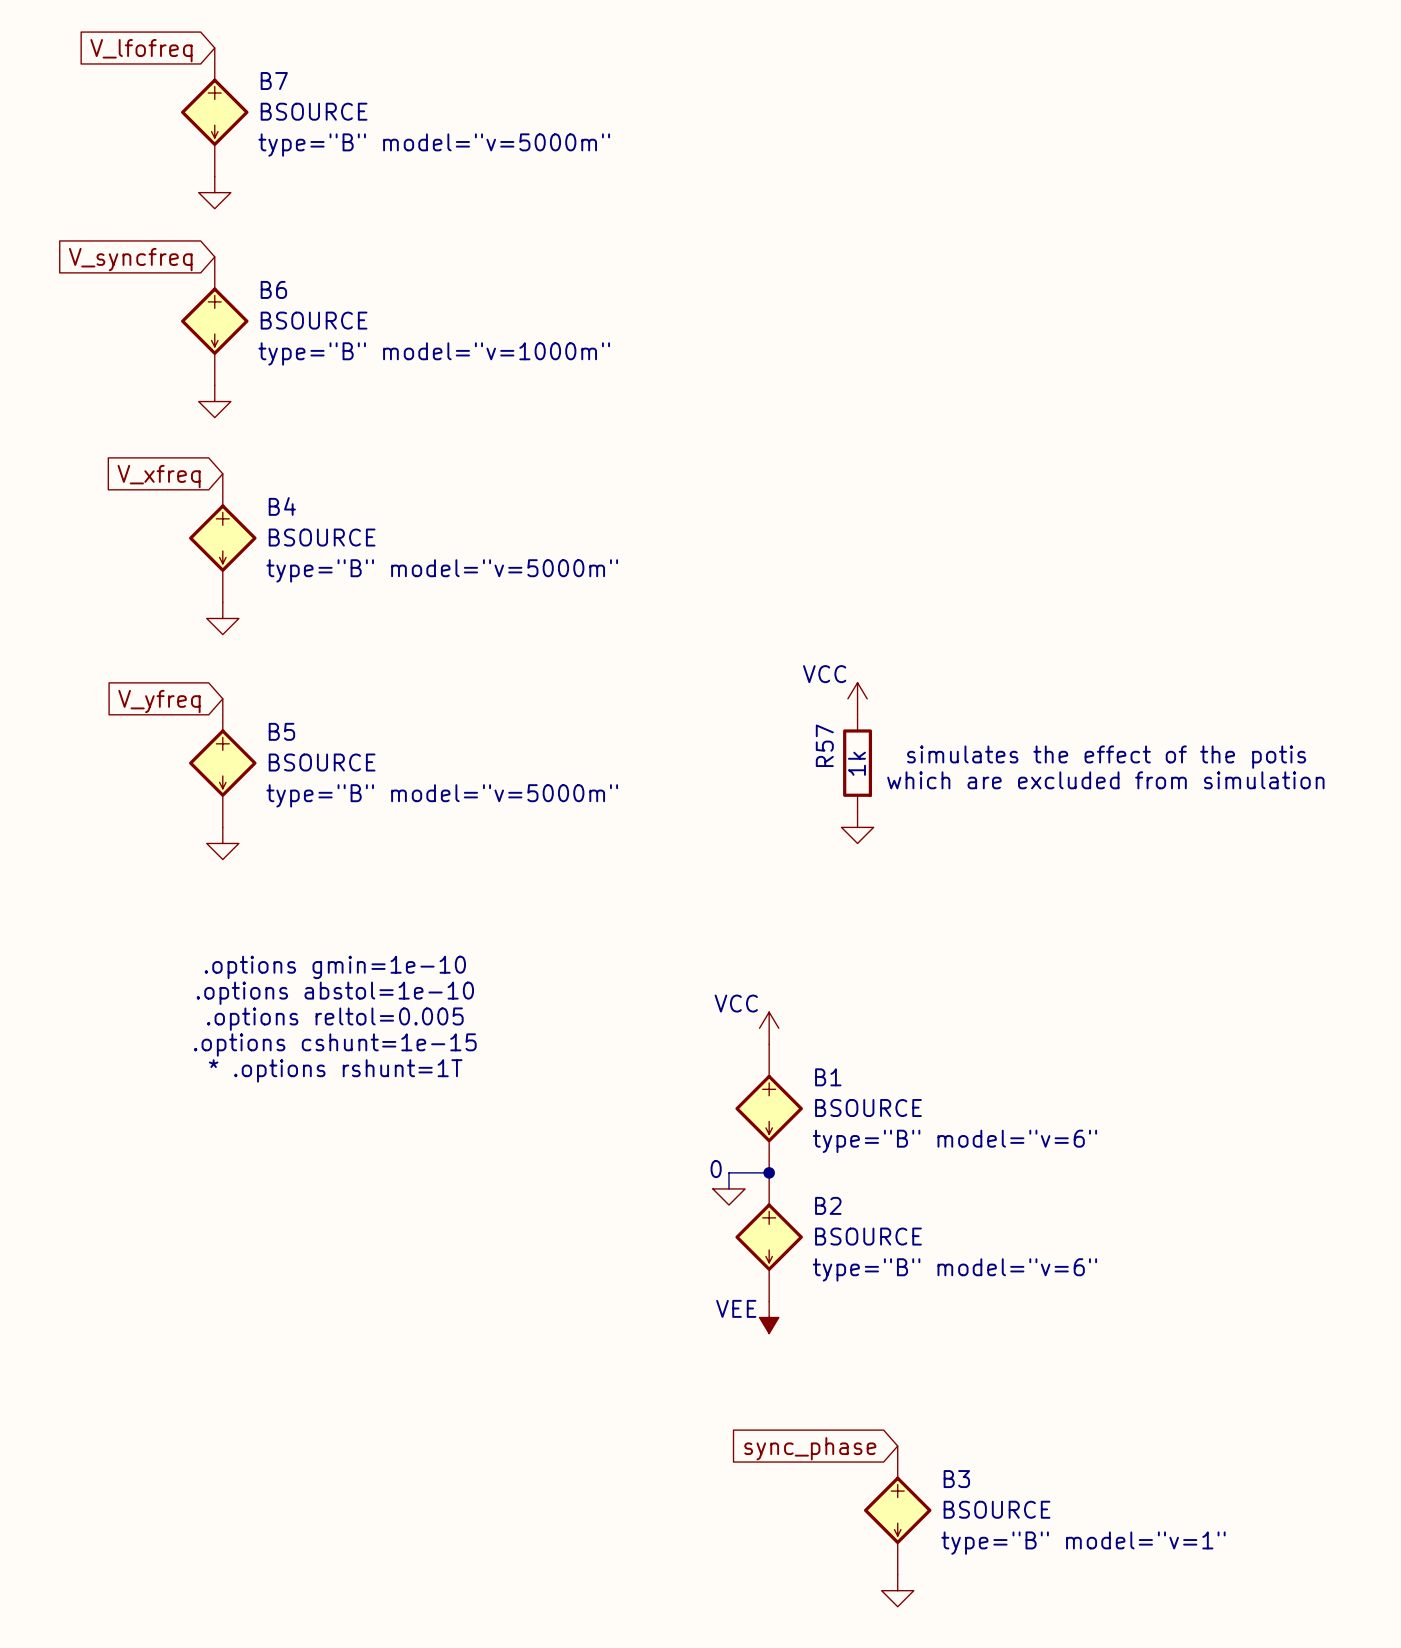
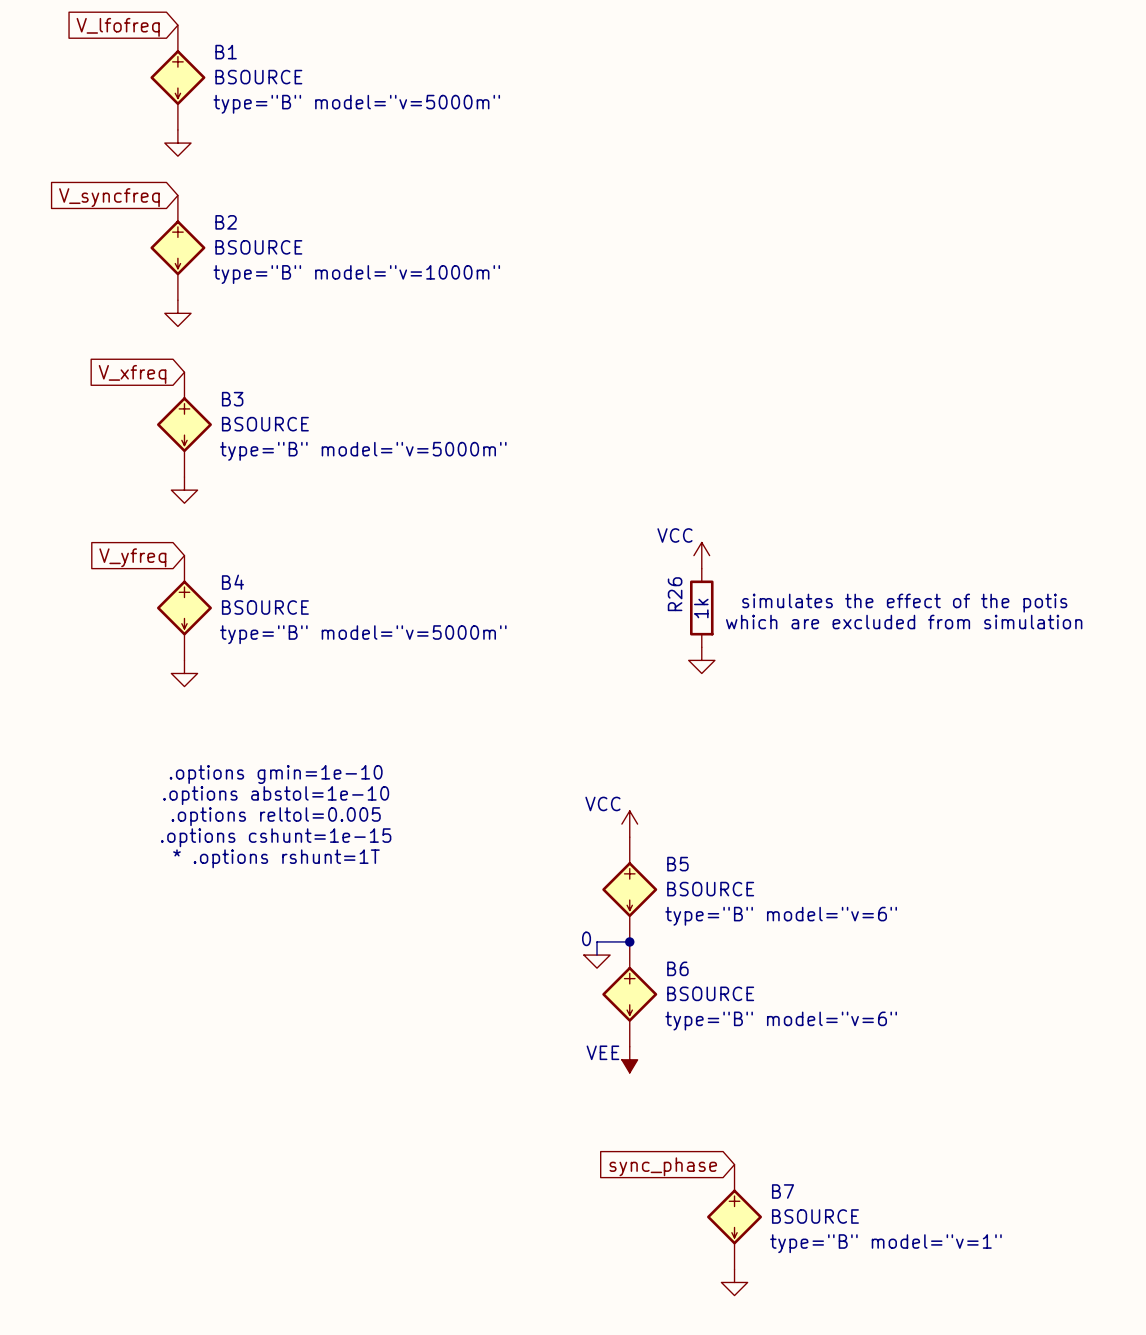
B7 name: B7 (274, 81) -> B1 (226, 52)
B6 name: B6 (273, 289) -> B2 (226, 222)
B4 name: B4 (282, 506) -> B3 (232, 399)
B5 name: B5 (281, 731) -> B4 (232, 582)
R57 name: R57 (824, 745) -> R26 (675, 594)
B1 name: B1 (828, 1077) -> B5 (677, 864)
B2 name: B2 (828, 1205) -> B6 (677, 968)
B3 name: B3 (956, 1479) -> B7 (783, 1191)

